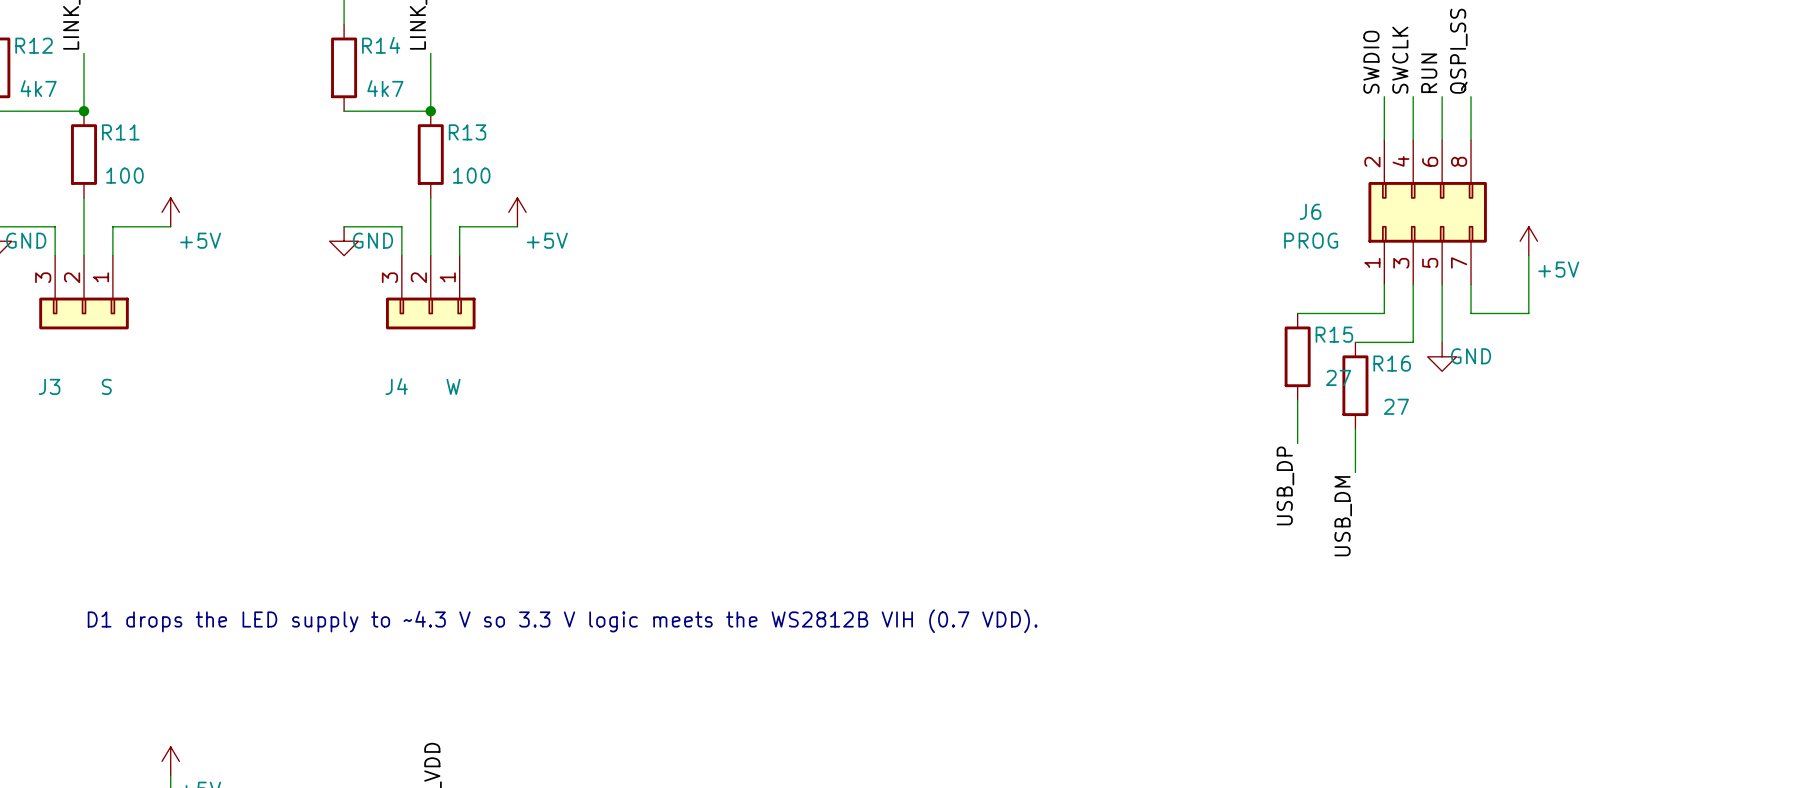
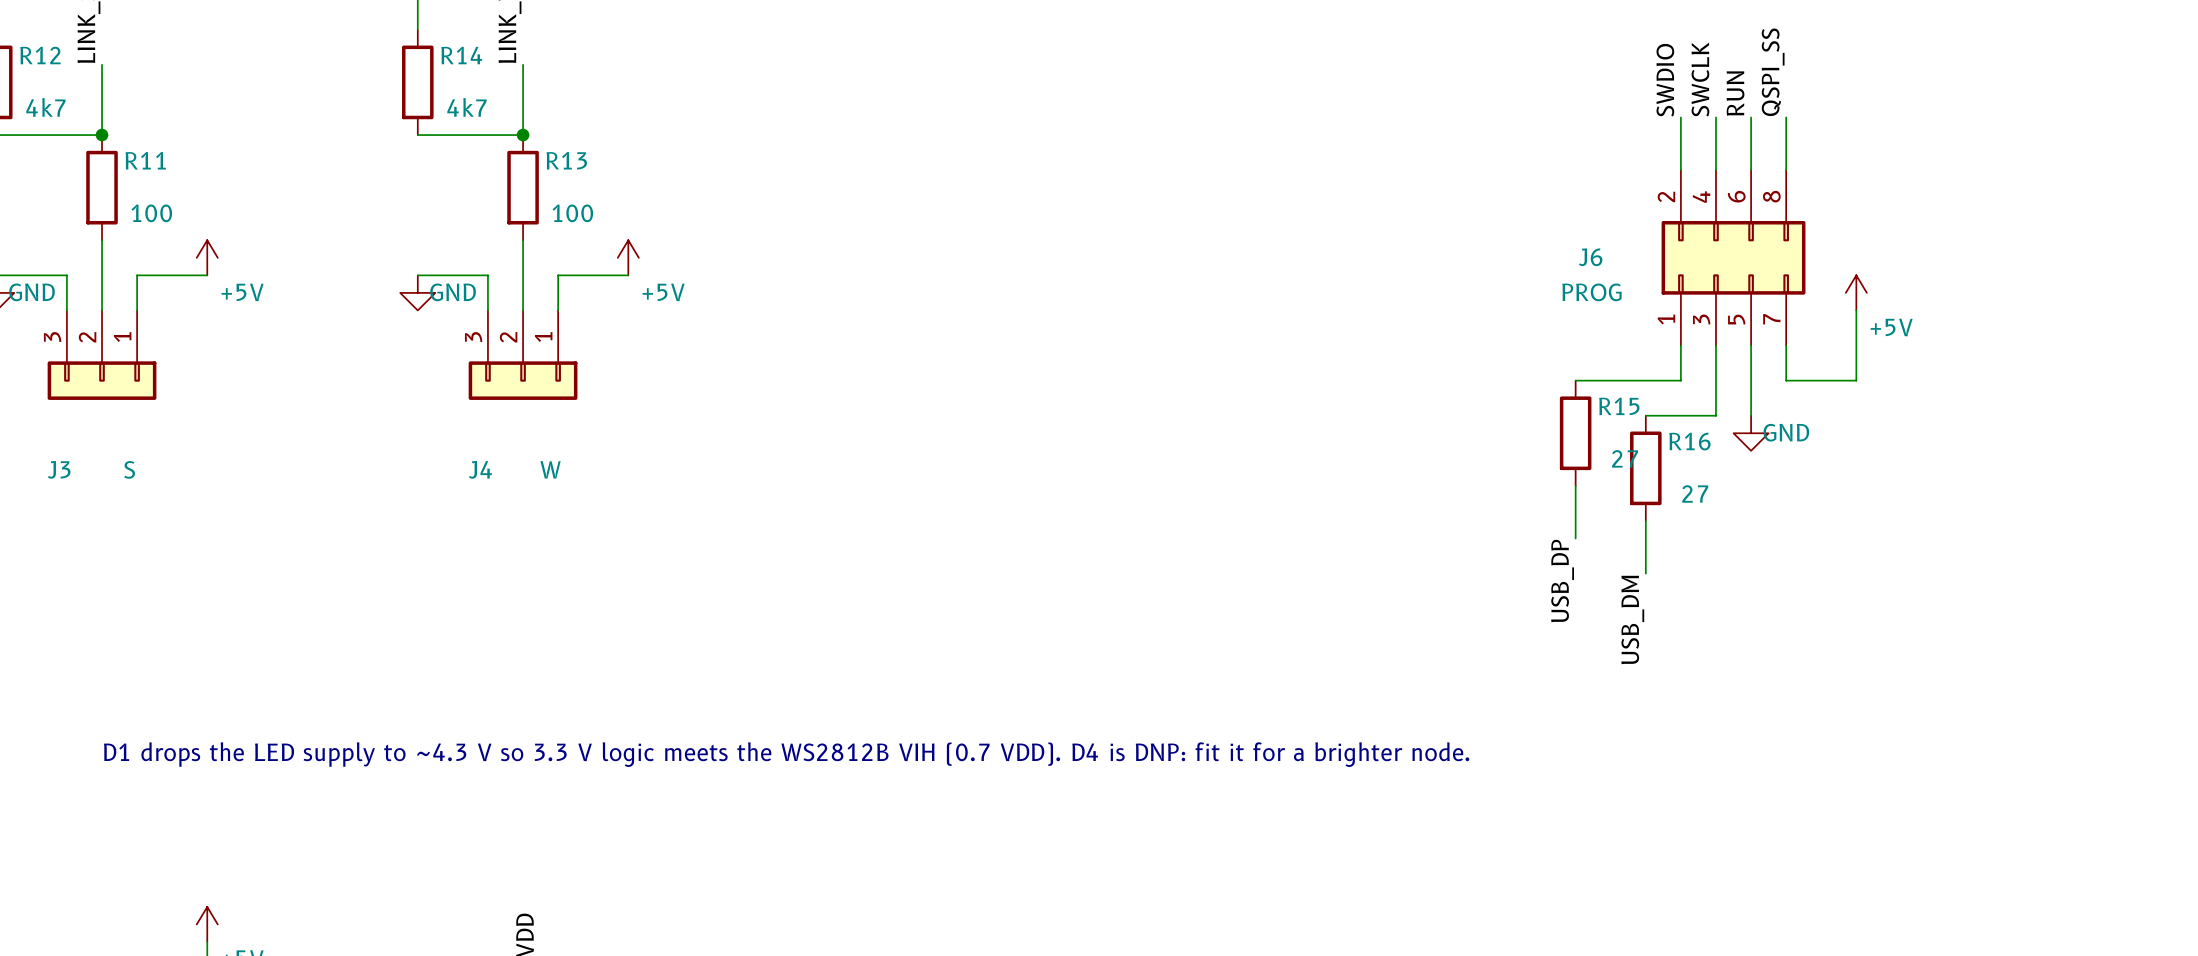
text: D1 drops the LED supply to ~4.3 V so 3.3 V logic meets the WS2812B VIH (0.7 VDD). (562, 621) -> D1 drops the LED supply to ~4.3 V so 3.3 V logic meets the WS2812B VIH (0.7 VDD). D4 is DNP: fit it for a brighter node. (786, 754)

